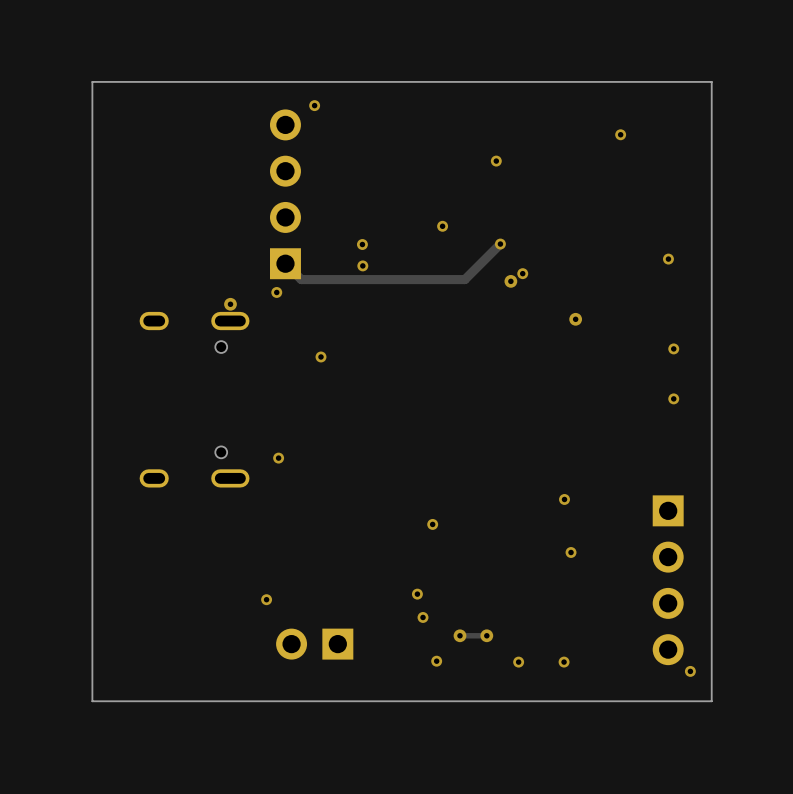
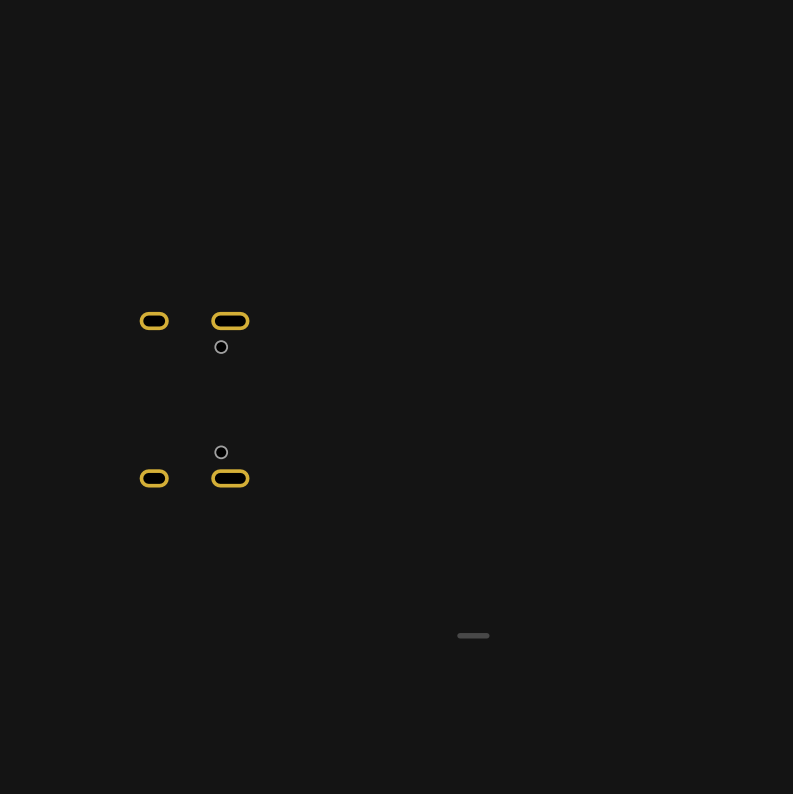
board edge: (711, 81) (92, 81) (92, 701) (711, 701) (711, 81) -> none
via: (314, 105) -> none
via: (620, 134) -> none
via: (496, 161) -> none
part: (285, 194) -> none
via: (442, 226) -> none
via: (362, 244) -> none
track: (500, 244) (464, 279) (301, 279) (285, 263) -> none
via: (500, 244) -> none
via: (668, 259) -> none
via: (362, 265) -> none
via: (522, 273) -> none
via: (510, 281) -> none
via: (276, 292) -> none
via: (230, 304) -> none
via: (575, 319) -> none
via: (673, 348) -> none
via: (321, 356) -> none
via: (673, 398) -> none
via: (278, 458) -> none
via: (564, 499) -> none
via: (432, 524) -> none
via: (571, 552) -> none
part: (668, 580) -> none
via: (417, 594) -> none
via: (266, 599) -> none
via: (423, 617) -> none
via: (459, 635) -> none
via: (486, 635) -> none
part: (314, 644) -> none
via: (436, 661) -> none
via: (518, 662) -> none
via: (564, 662) -> none
via: (690, 671) -> none

